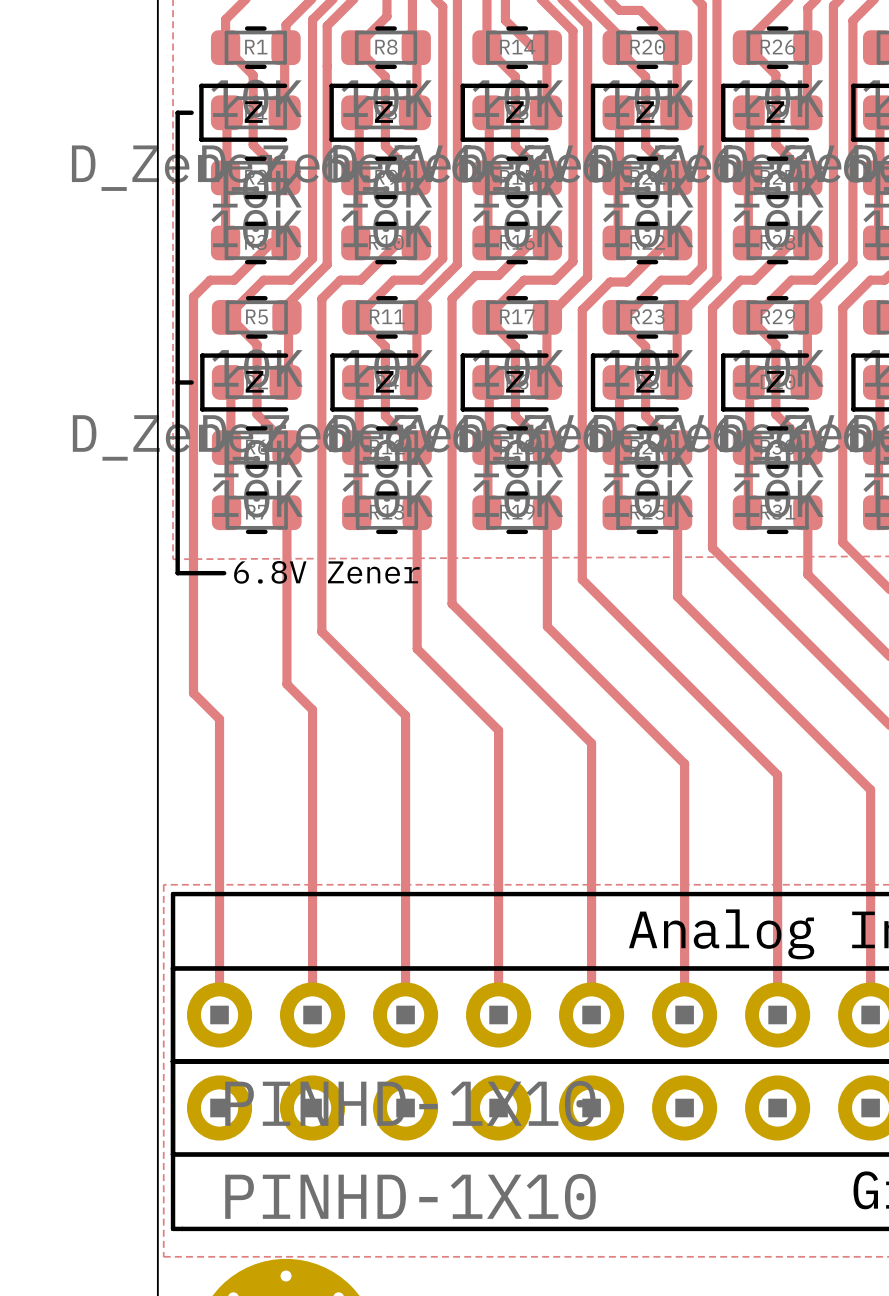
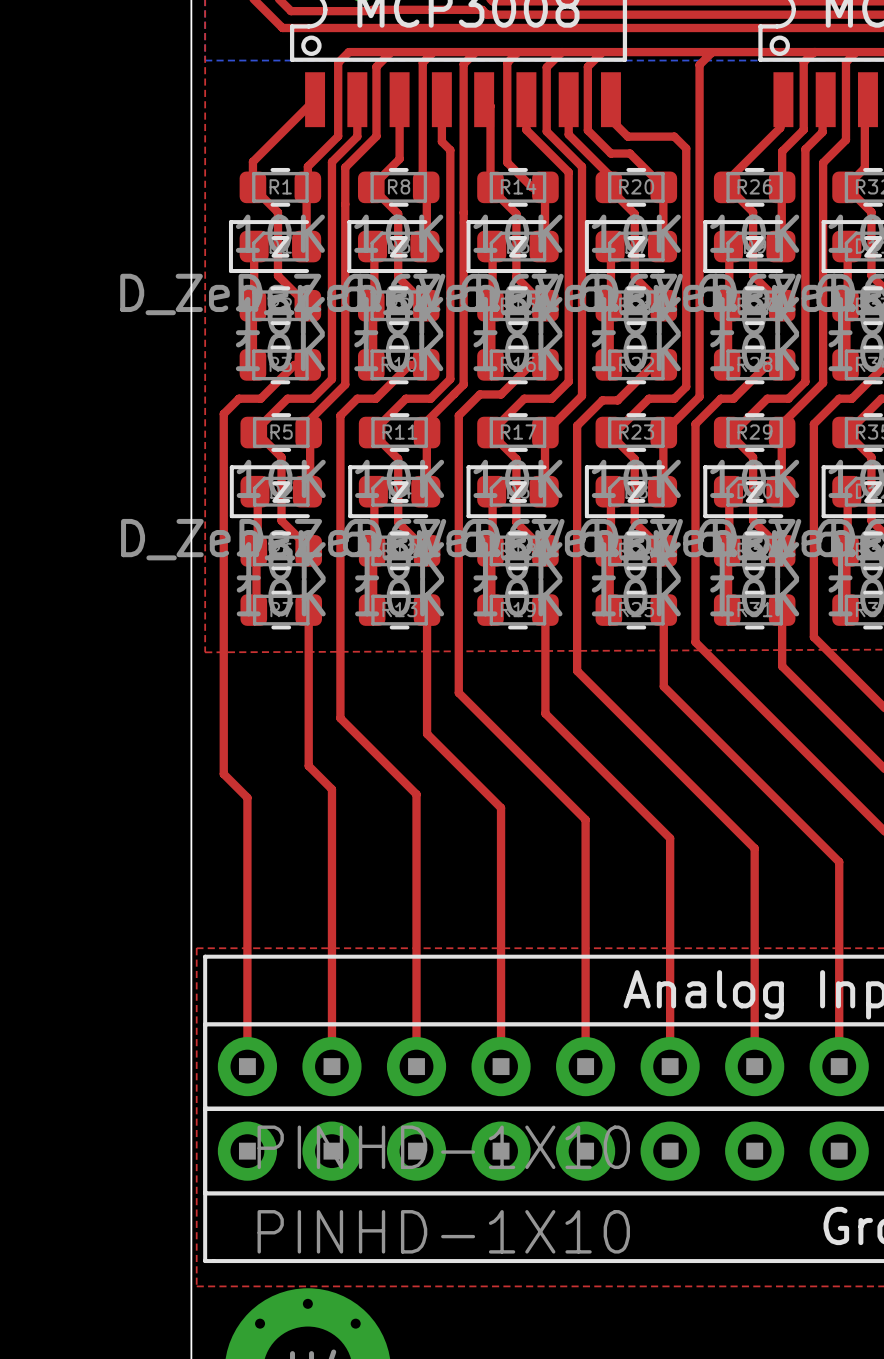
line: (191, 112) (177, 112) (177, 573) (224, 573) -> none
line: (177, 382) (191, 382) -> none
text: 6.8V Zener (326, 572) -> none

